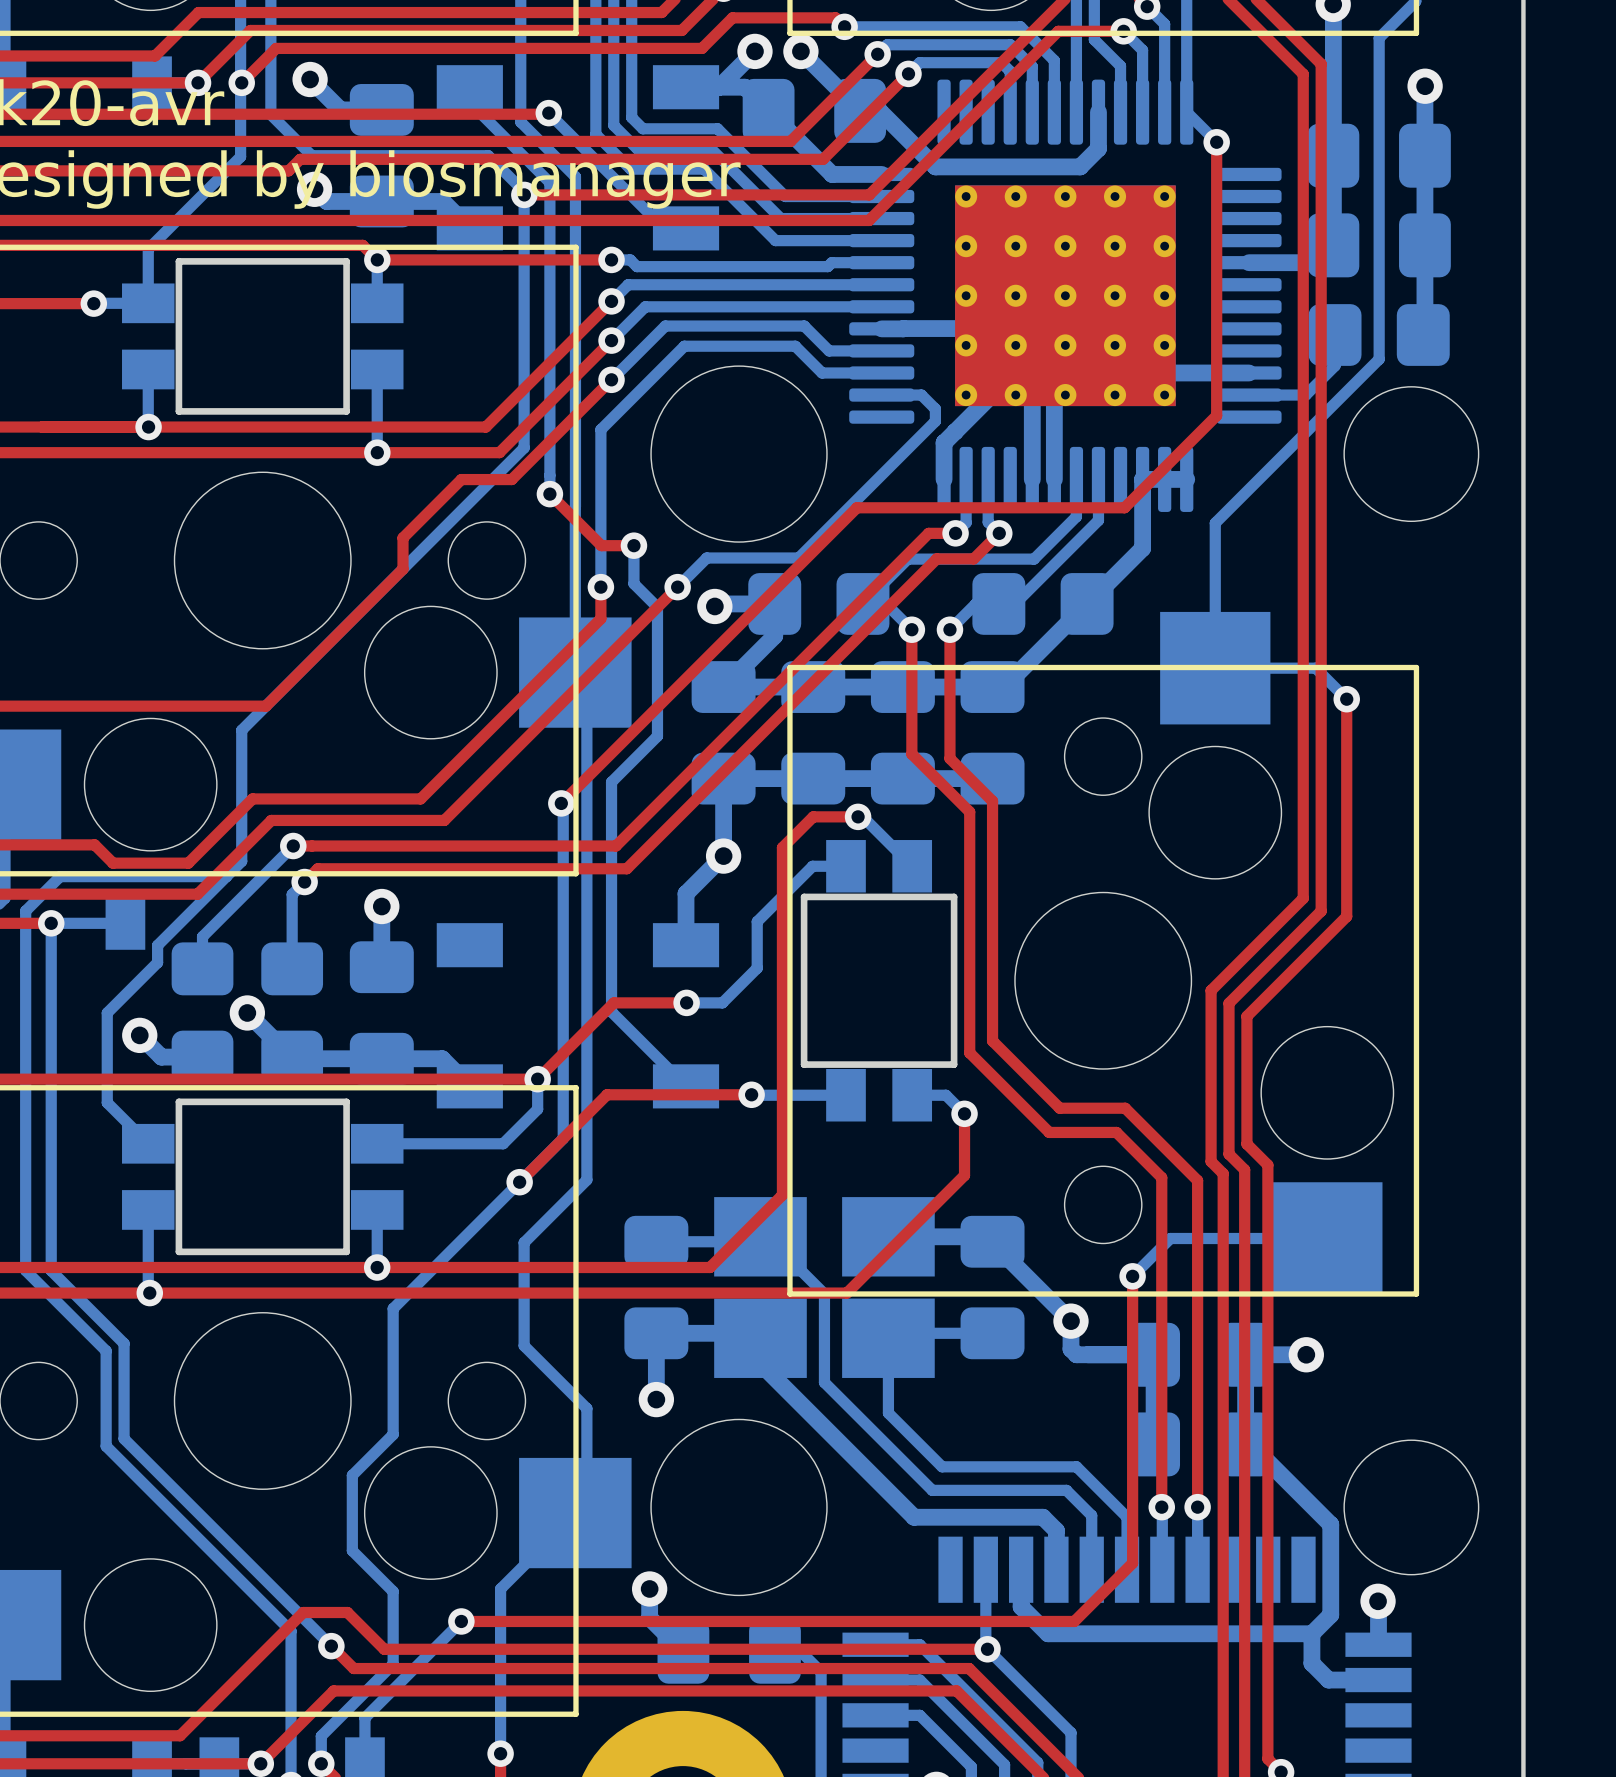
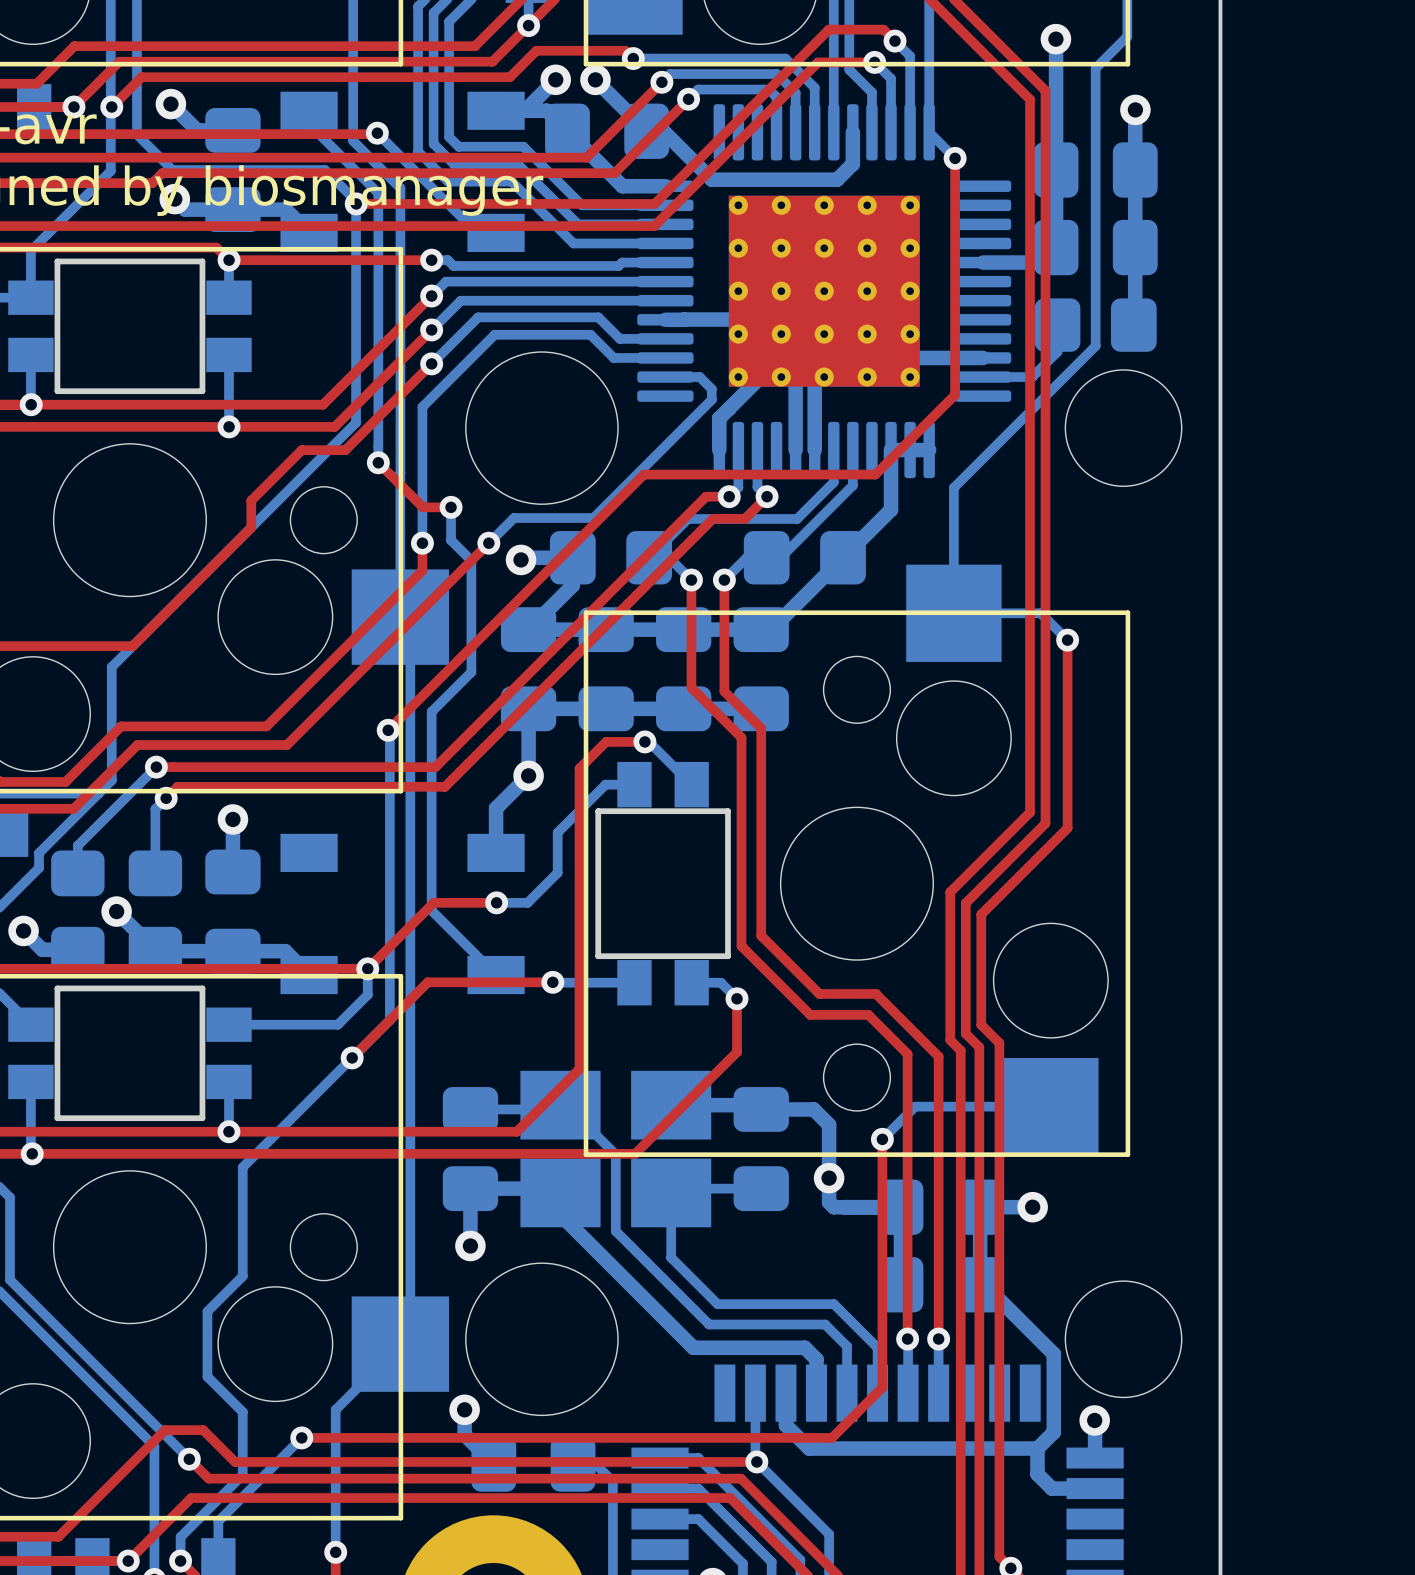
bottom track: (586, 1179) (524, 1242) (524, 1345) (586, 1408) -> (410, 1055) (410, 1253)
bottom track: (992, 1241) (1070, 1321) -> (761, 1109) (813, 1109) (829, 1124) (829, 1178)

